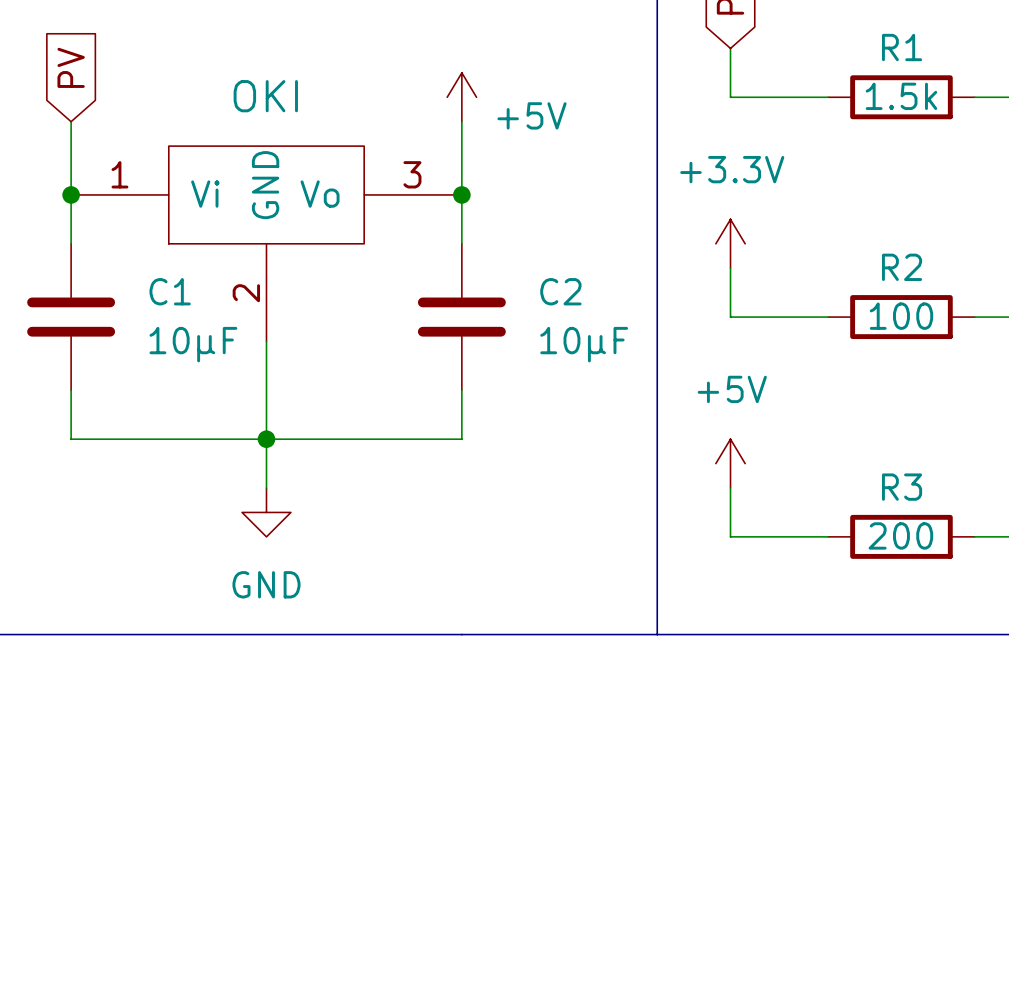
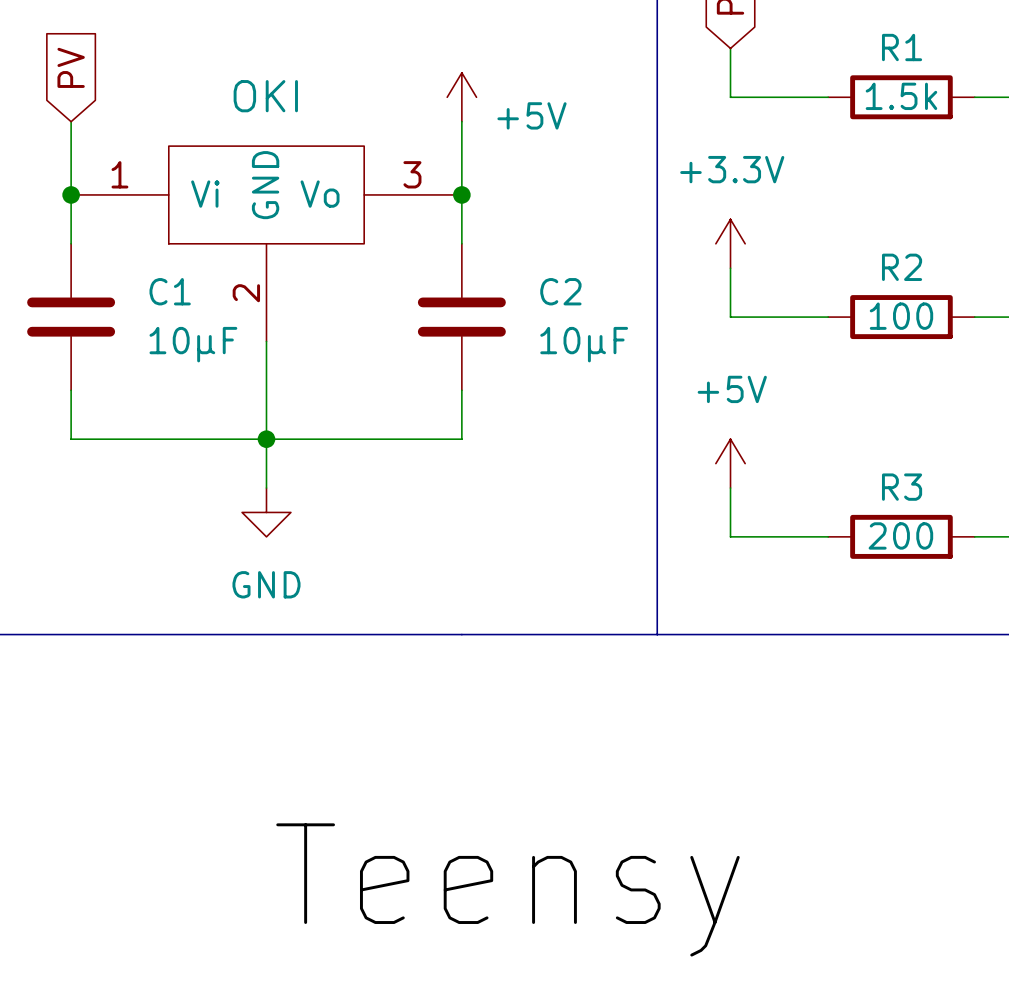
label: none -> Teensy (507, 889)

